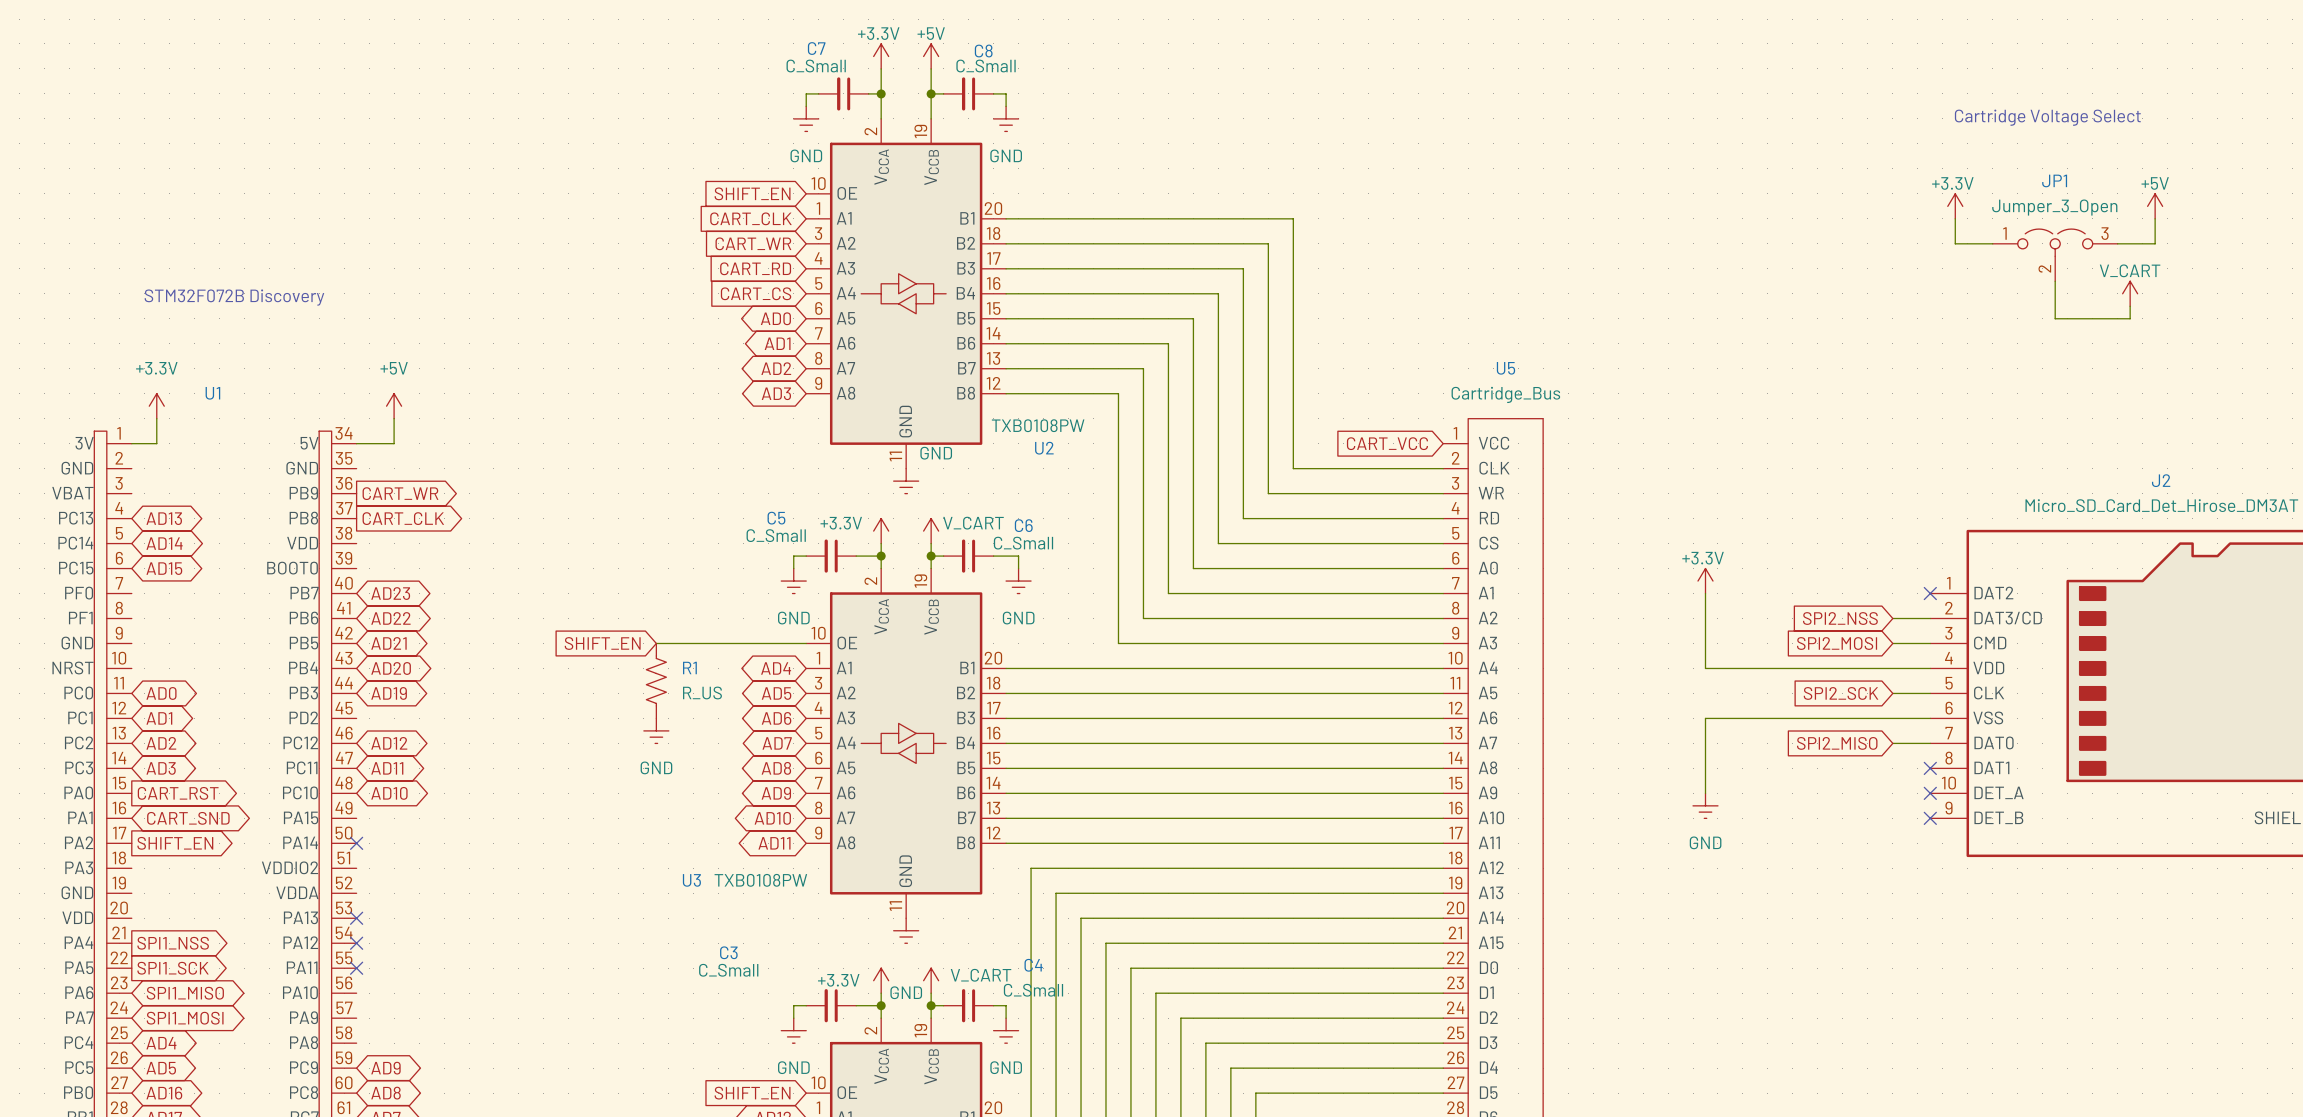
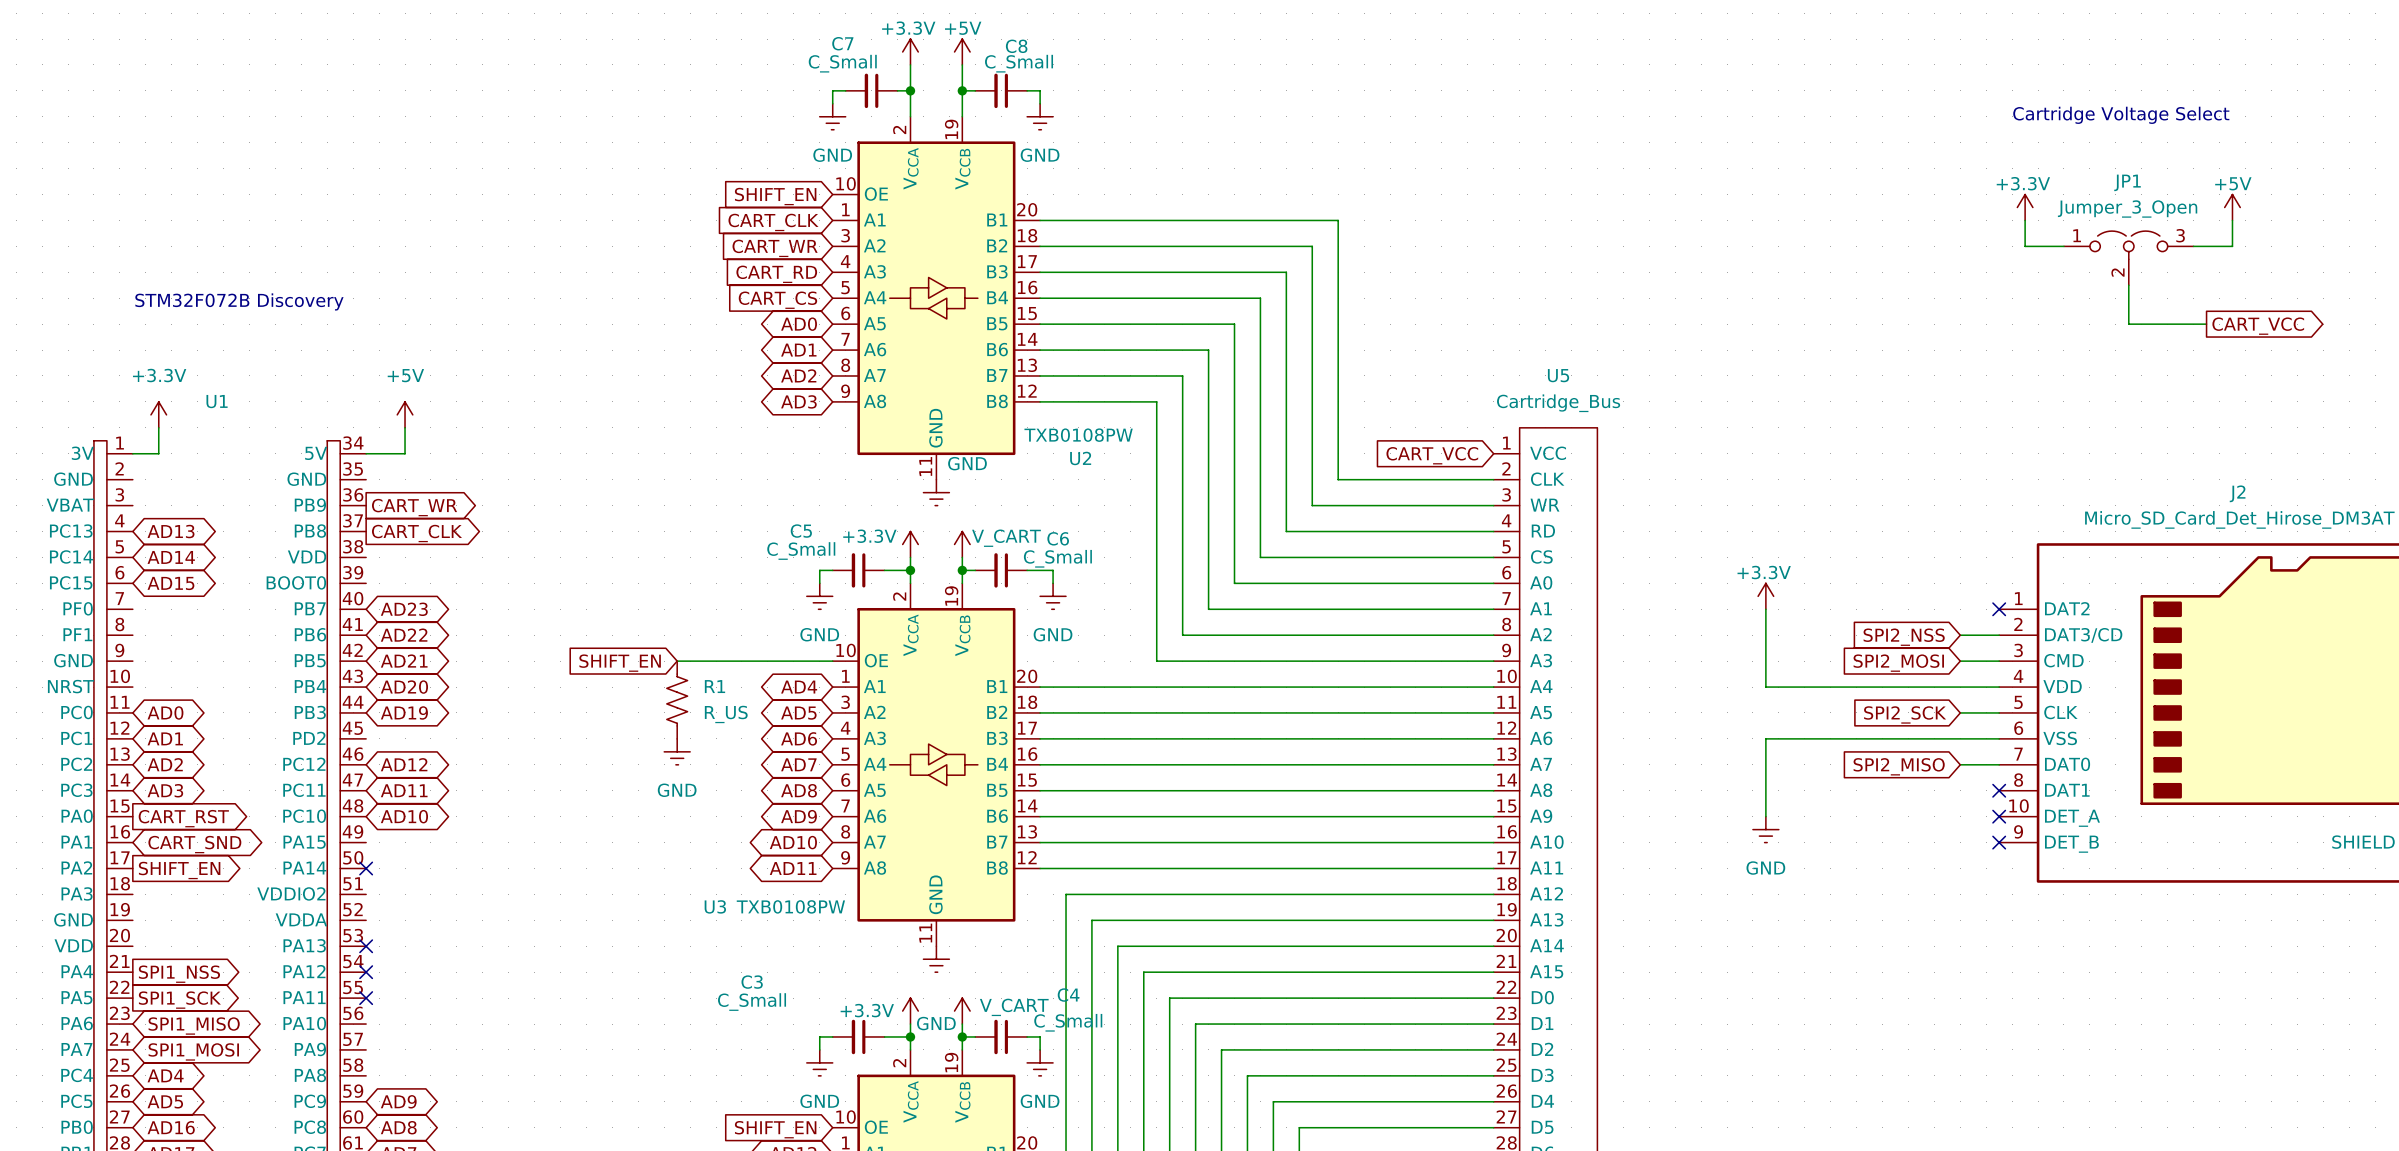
power symbol: V_CART (2130, 293) -> none
global label: none -> CART_VCC (2258, 326)

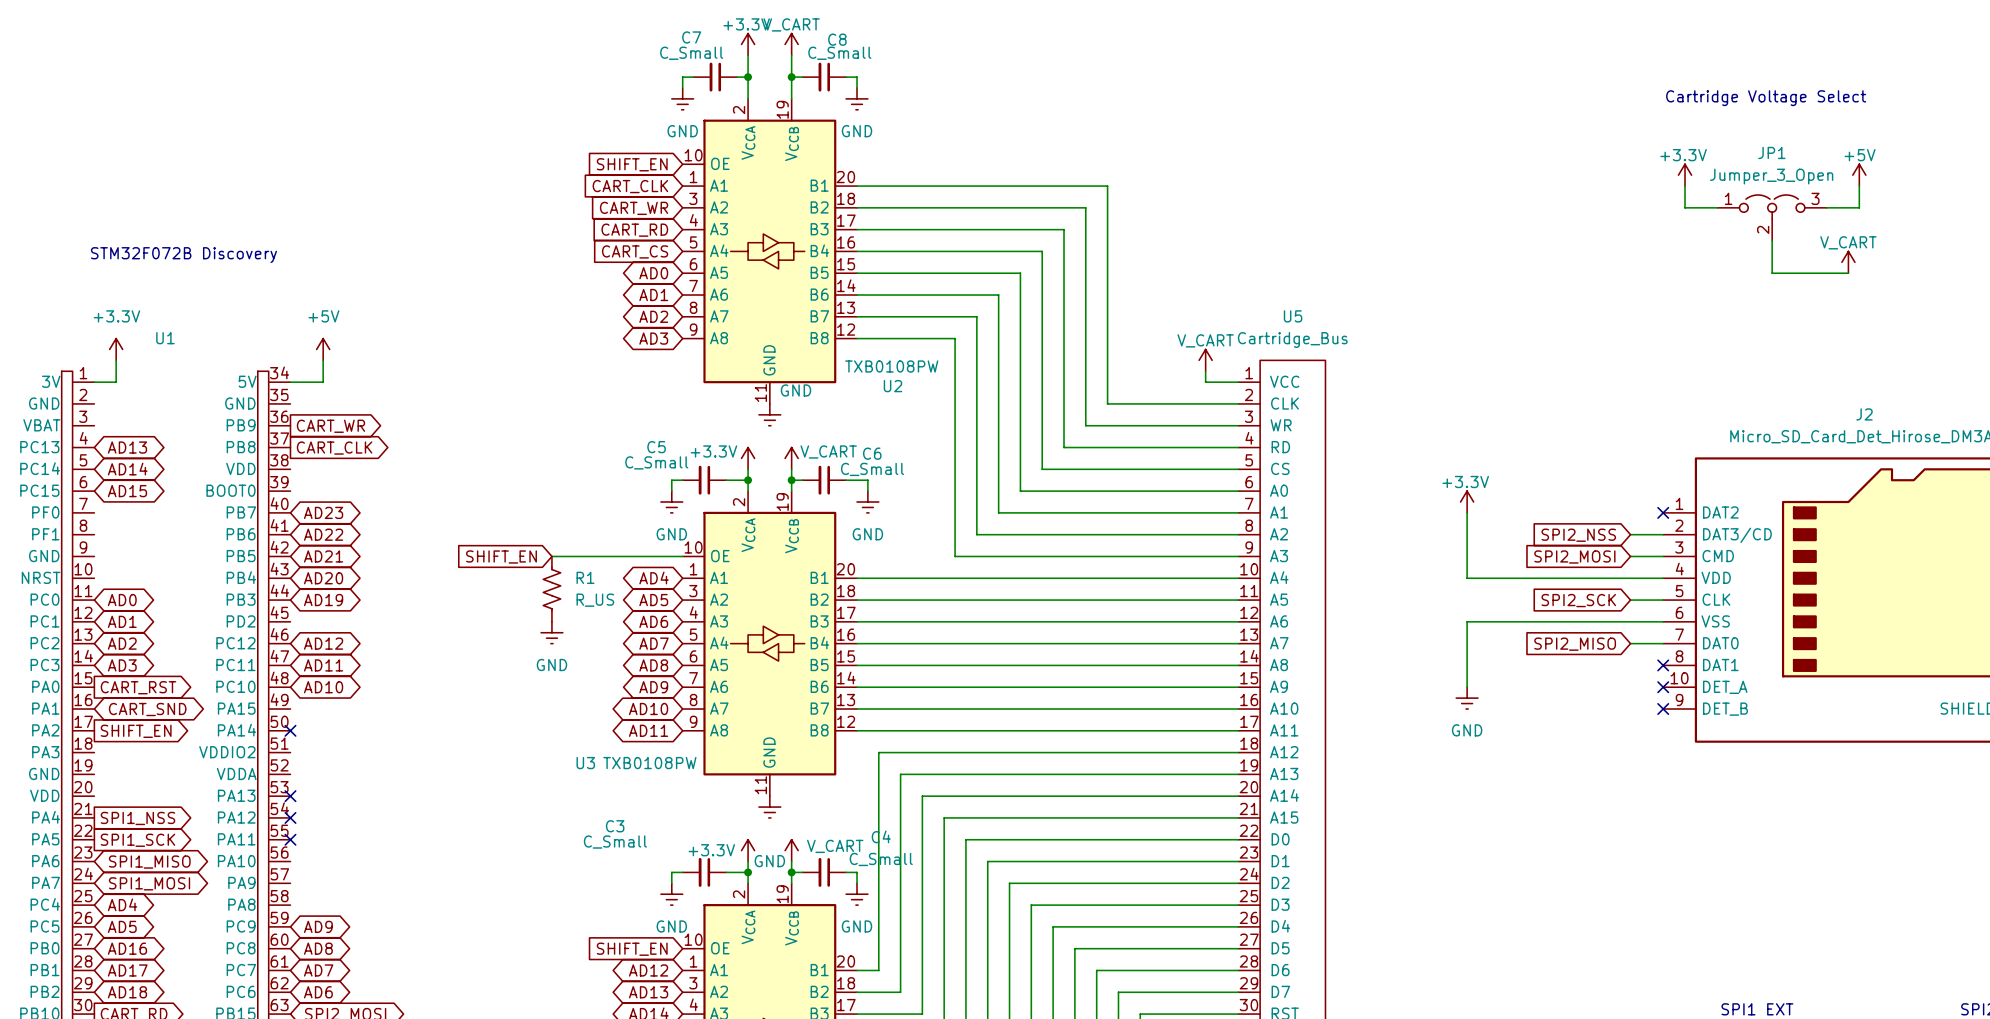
power symbol: +5V (962, 51) -> V_CART (791, 44)
power symbol: none -> V_CART (1848, 262)
wire: none -> (1837, 273) (1848, 273)
global label: CART_VCC (2258, 326) -> none
power symbol: none -> V_CART (1205, 360)
wire: none -> (1205, 371) (1205, 382) (1238, 382)
global label: CART_VCC (1432, 455) -> none

